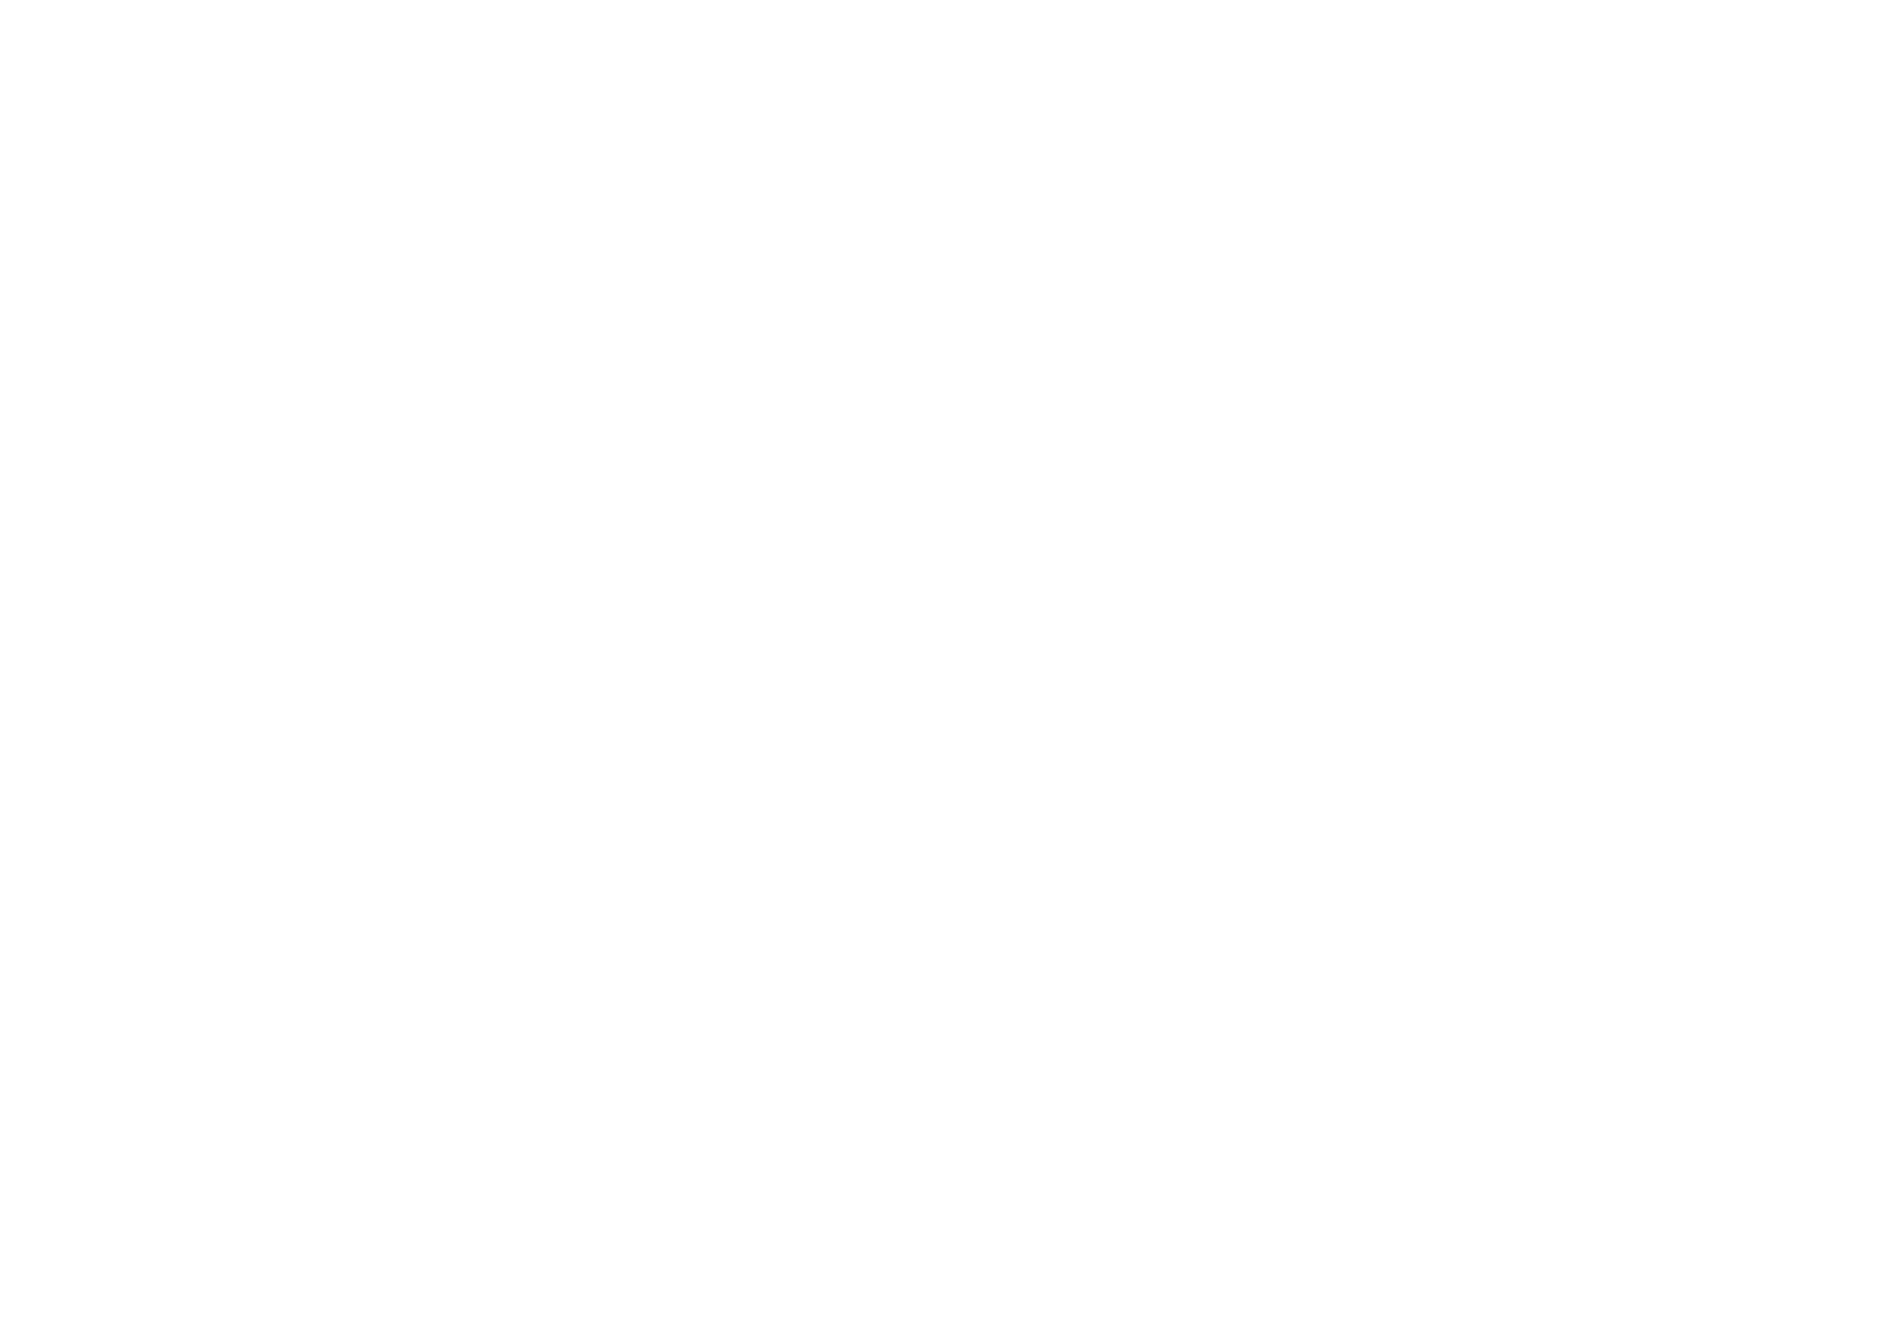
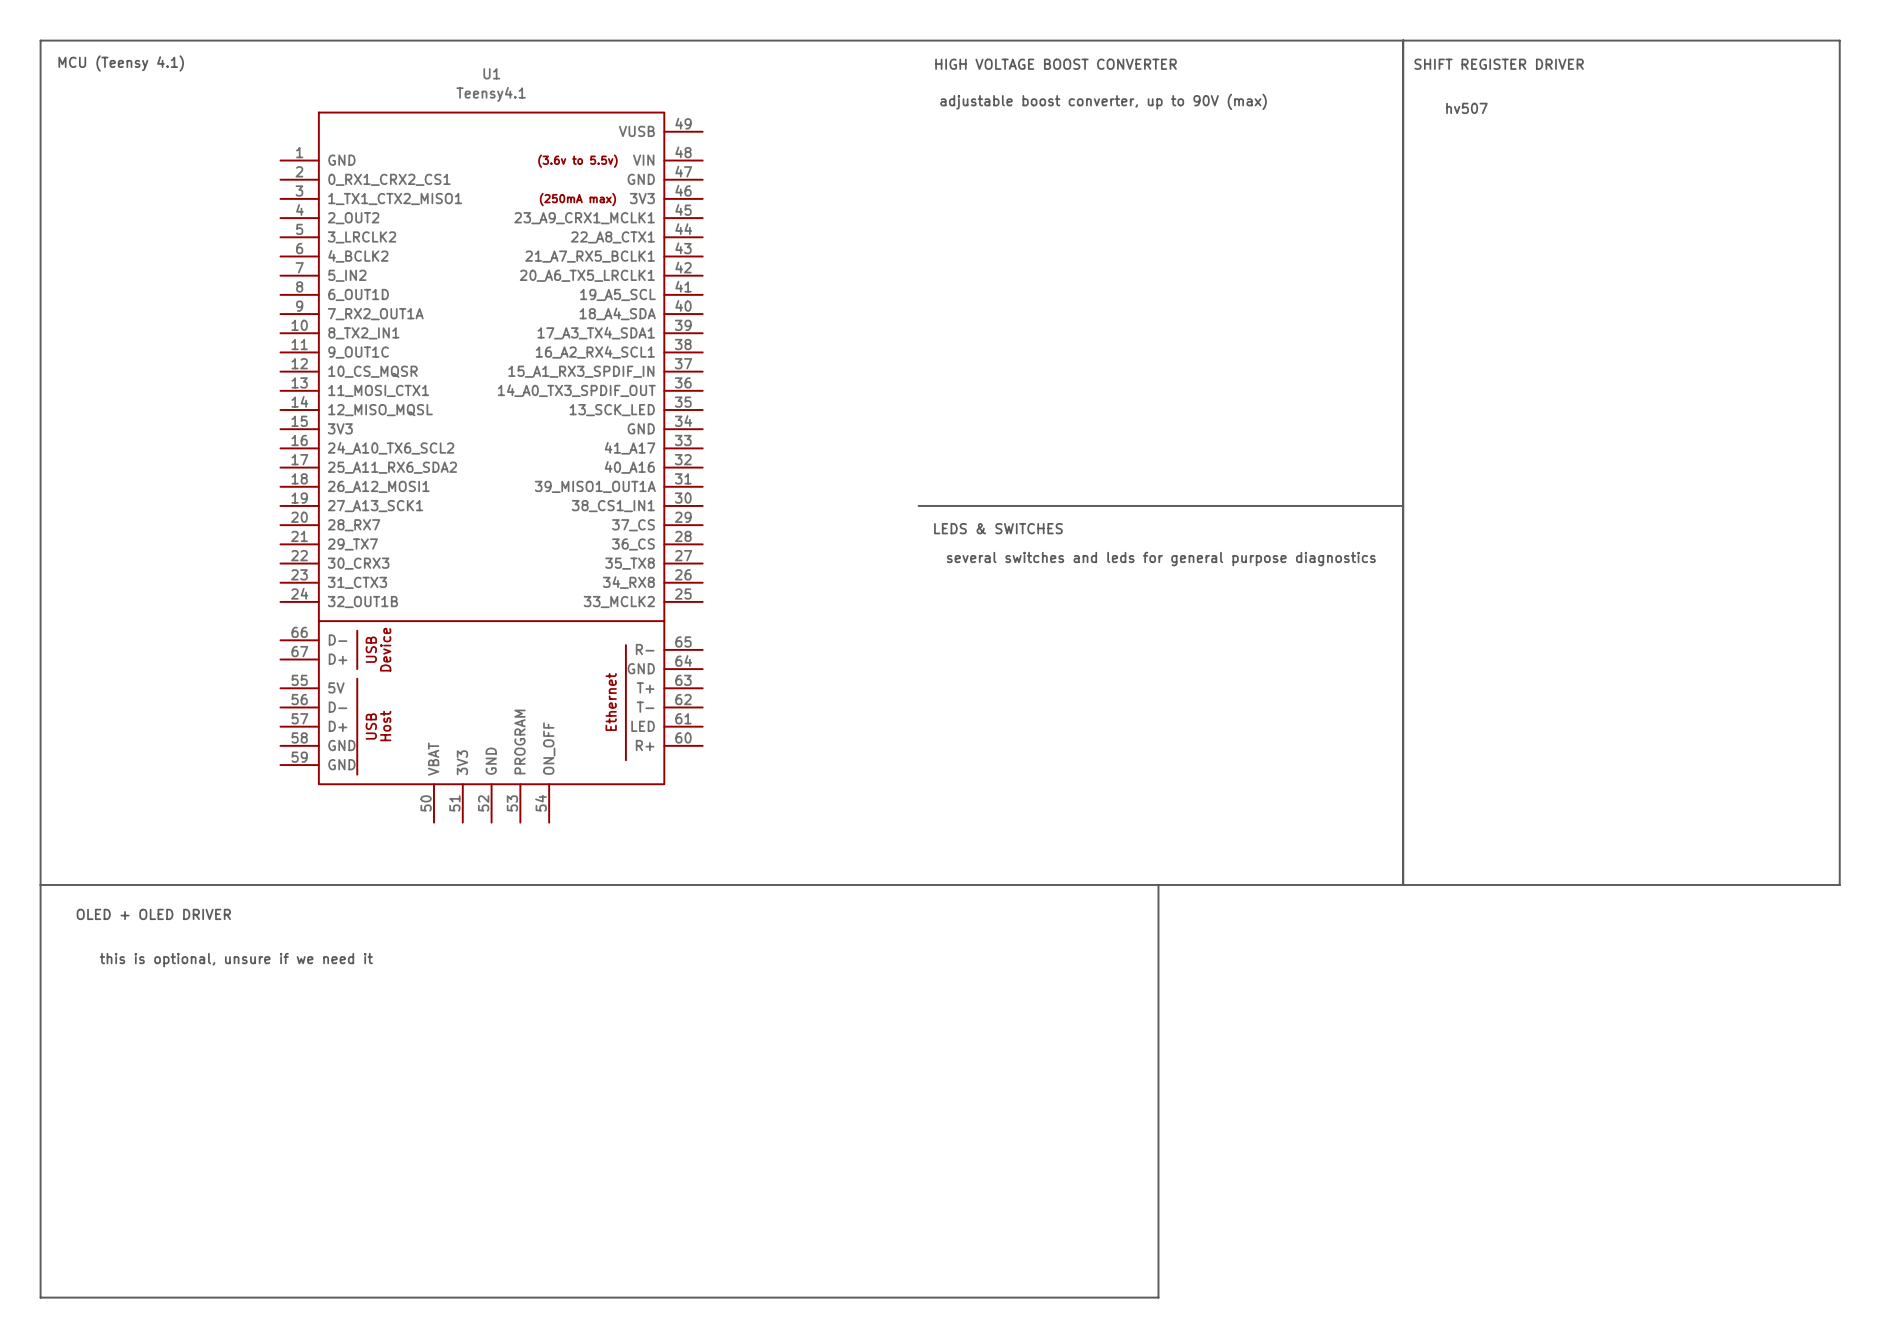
line: none -> (1403, 40) (1403, 885)
text: none -> MCU (Teensy 4.1) (121, 63)
text: none -> HIGH VOLTAGE BOOST CONVERTER (1056, 64)
text: none -> SHIFT REGISTER DRIVER (1499, 64)
text: none -> adjustable boost converter, up to 90V (max) (1103, 101)
text: none -> hv507 (1466, 108)
U1: none -> Teensy4.1 (491, 467)
line: none -> (918, 505) (1403, 505)
text: none -> LEDS & SWITCHES (998, 528)
text: none -> several switches and leds for general purpose diagnostics (1161, 559)
line: none -> (40, 885) (1839, 885) (1839, 40) (40, 40) (40, 1297) (1158, 1297) (1158, 885)
text: none -> OLED + OLED DRIVER (153, 914)
text: none -> this is optional, unsure if we need it (236, 960)

